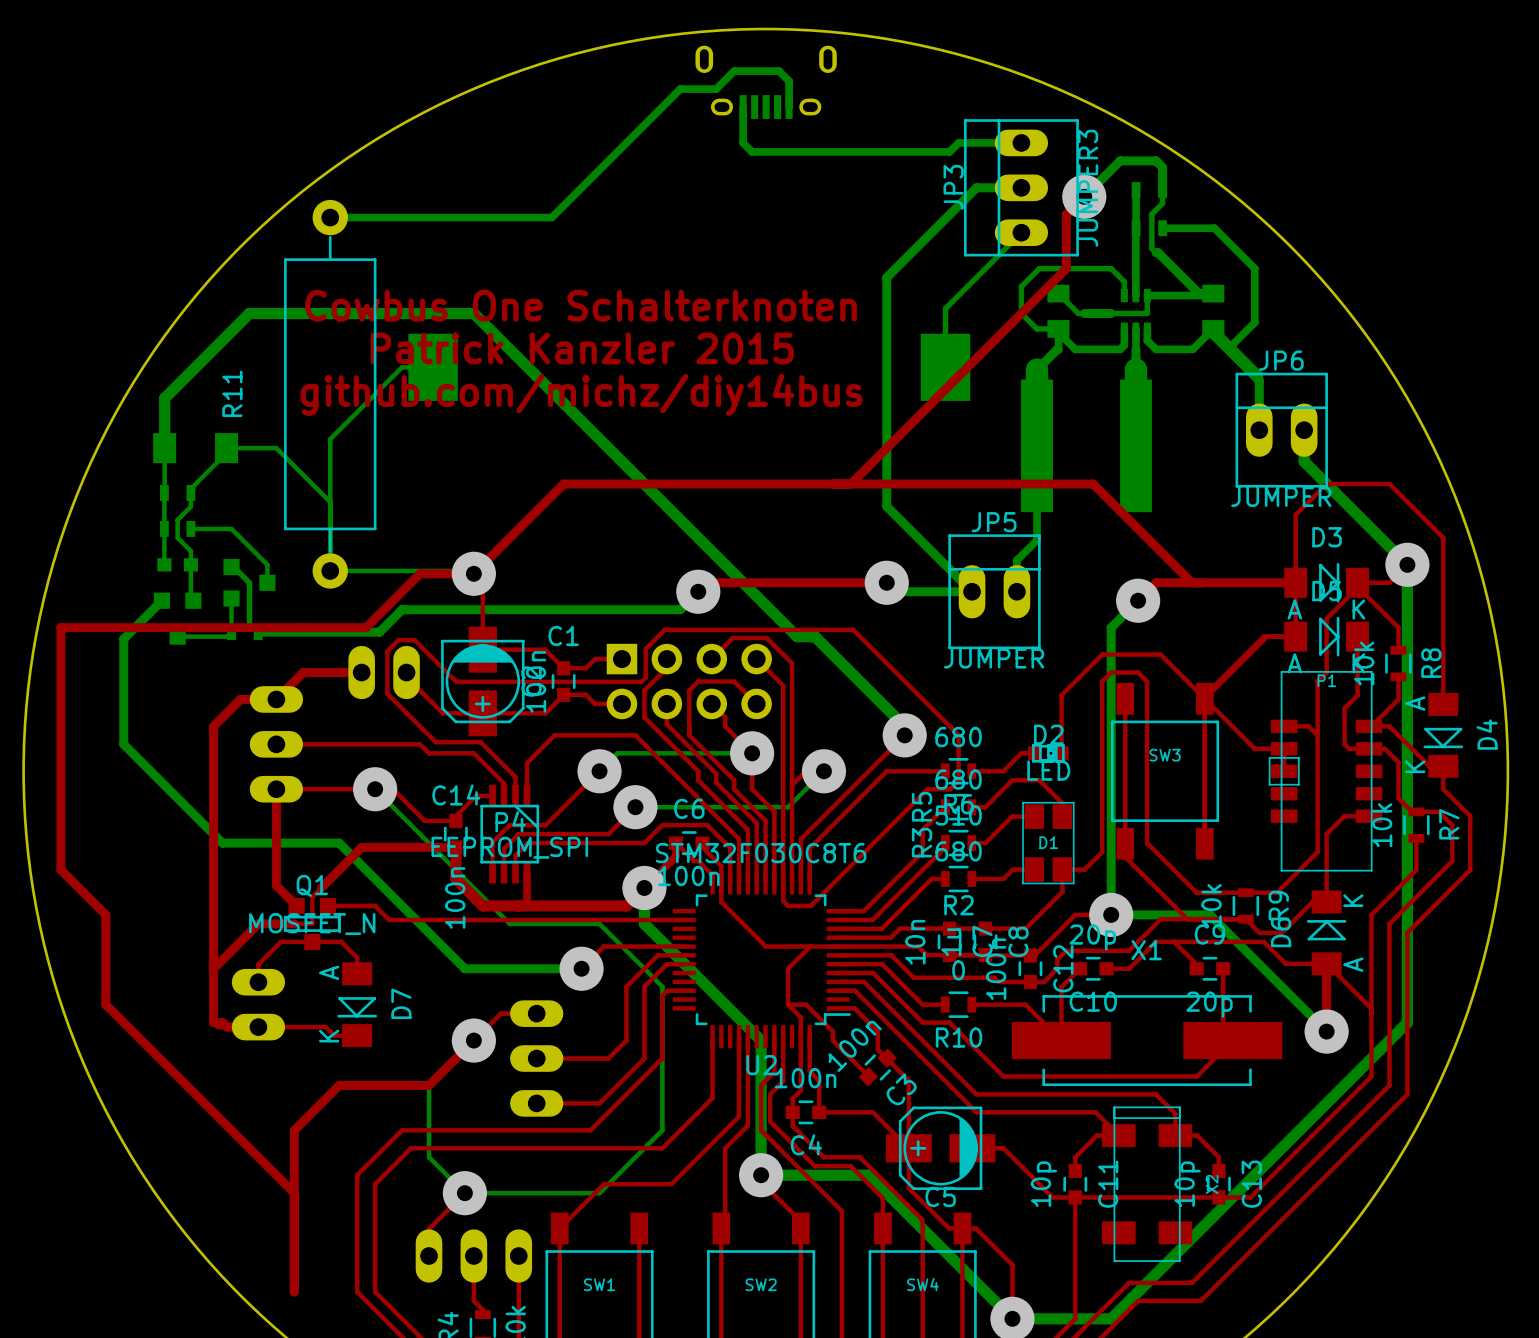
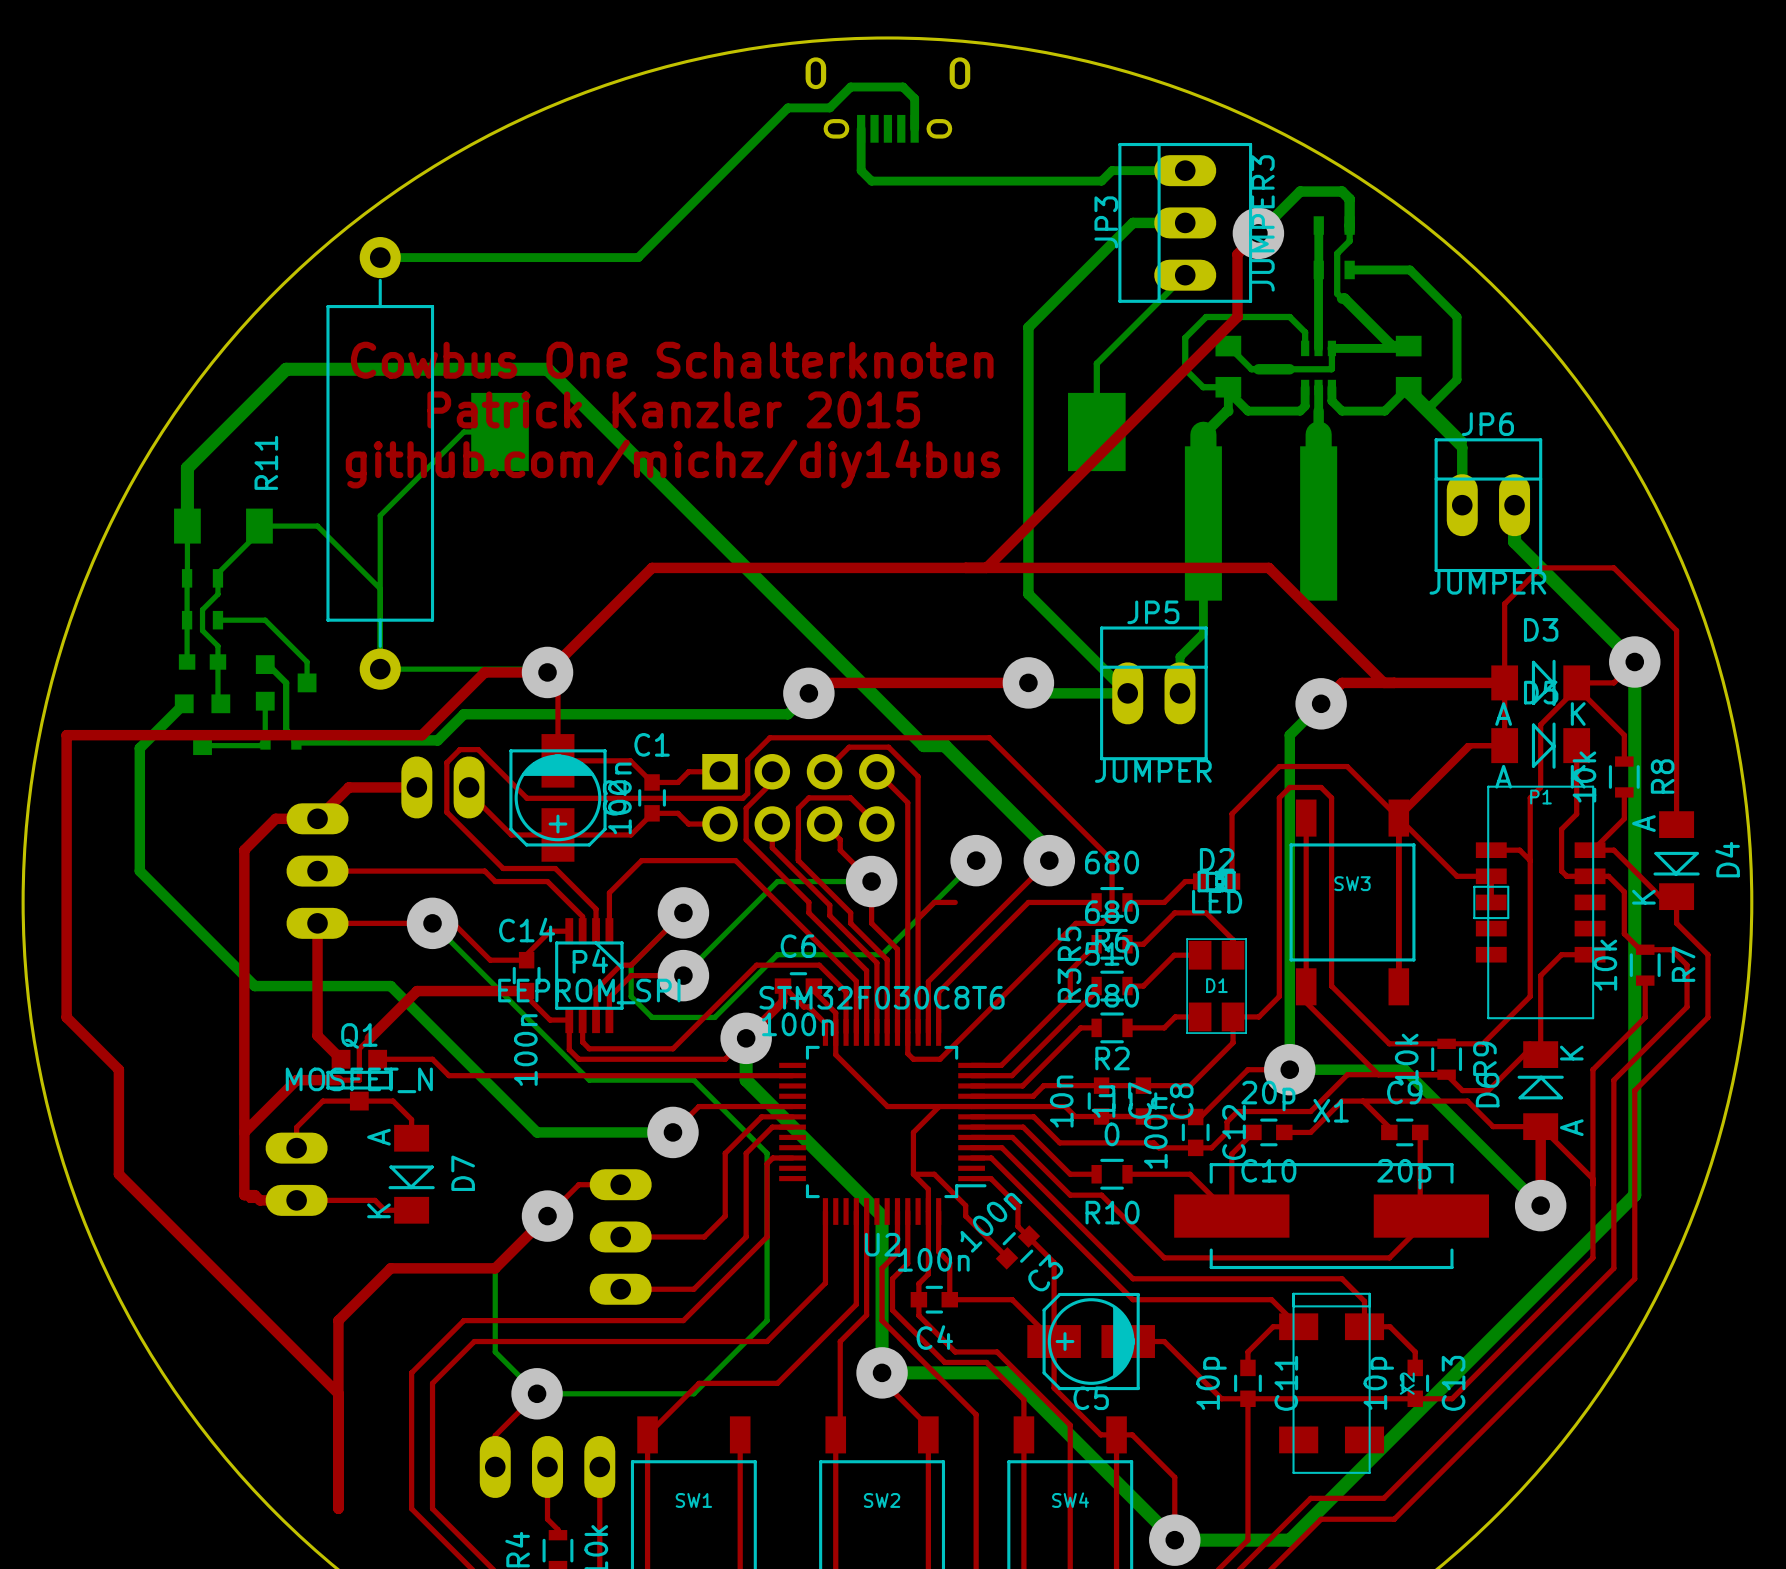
bottom track: none -> (976, 860) (882, 954) (777, 954) (714, 1017) (652, 1017) (631, 996) (631, 965) (683, 912)
bottom track: (671, 753) (617, 753) (599, 771) -> (777, 881) (683, 975)
via position: (599, 771) -> (683, 912)
bottom track: (823, 771) (788, 807) (635, 807) -> none
via position: (823, 771) -> (976, 860)
top track: (635, 807) (608, 834) (590, 834) -> none
via: (635, 807) -> none
top track: (536, 825) (509, 825) (492, 842) (492, 872) -> (620, 965) (596, 989) (596, 1000)
top track: (662, 825) (644, 843) (527, 843) (515, 855) -> (767, 965) (756, 965) (672, 1048) (589, 1048) (582, 1042) (582, 1020)
top track: (545, 834) (518, 834) (504, 848) (504, 872) -> (631, 975) (609, 997) (609, 1020)
via: none -> (683, 975)
top track: (455, 847) (455, 879) (482, 905) (500, 905) -> (526, 996) (550, 1020) (569, 1020) (569, 1049) (578, 1059)
top track: (527, 872) (527, 905) (518, 905) -> none
top track width: thick (644, 887) (626, 905) (527, 905) -> thin (746, 1038) (725, 1059) (609, 1059)
top track width: thick (500, 905) (518, 905) -> thin (578, 1059) (599, 1059)

